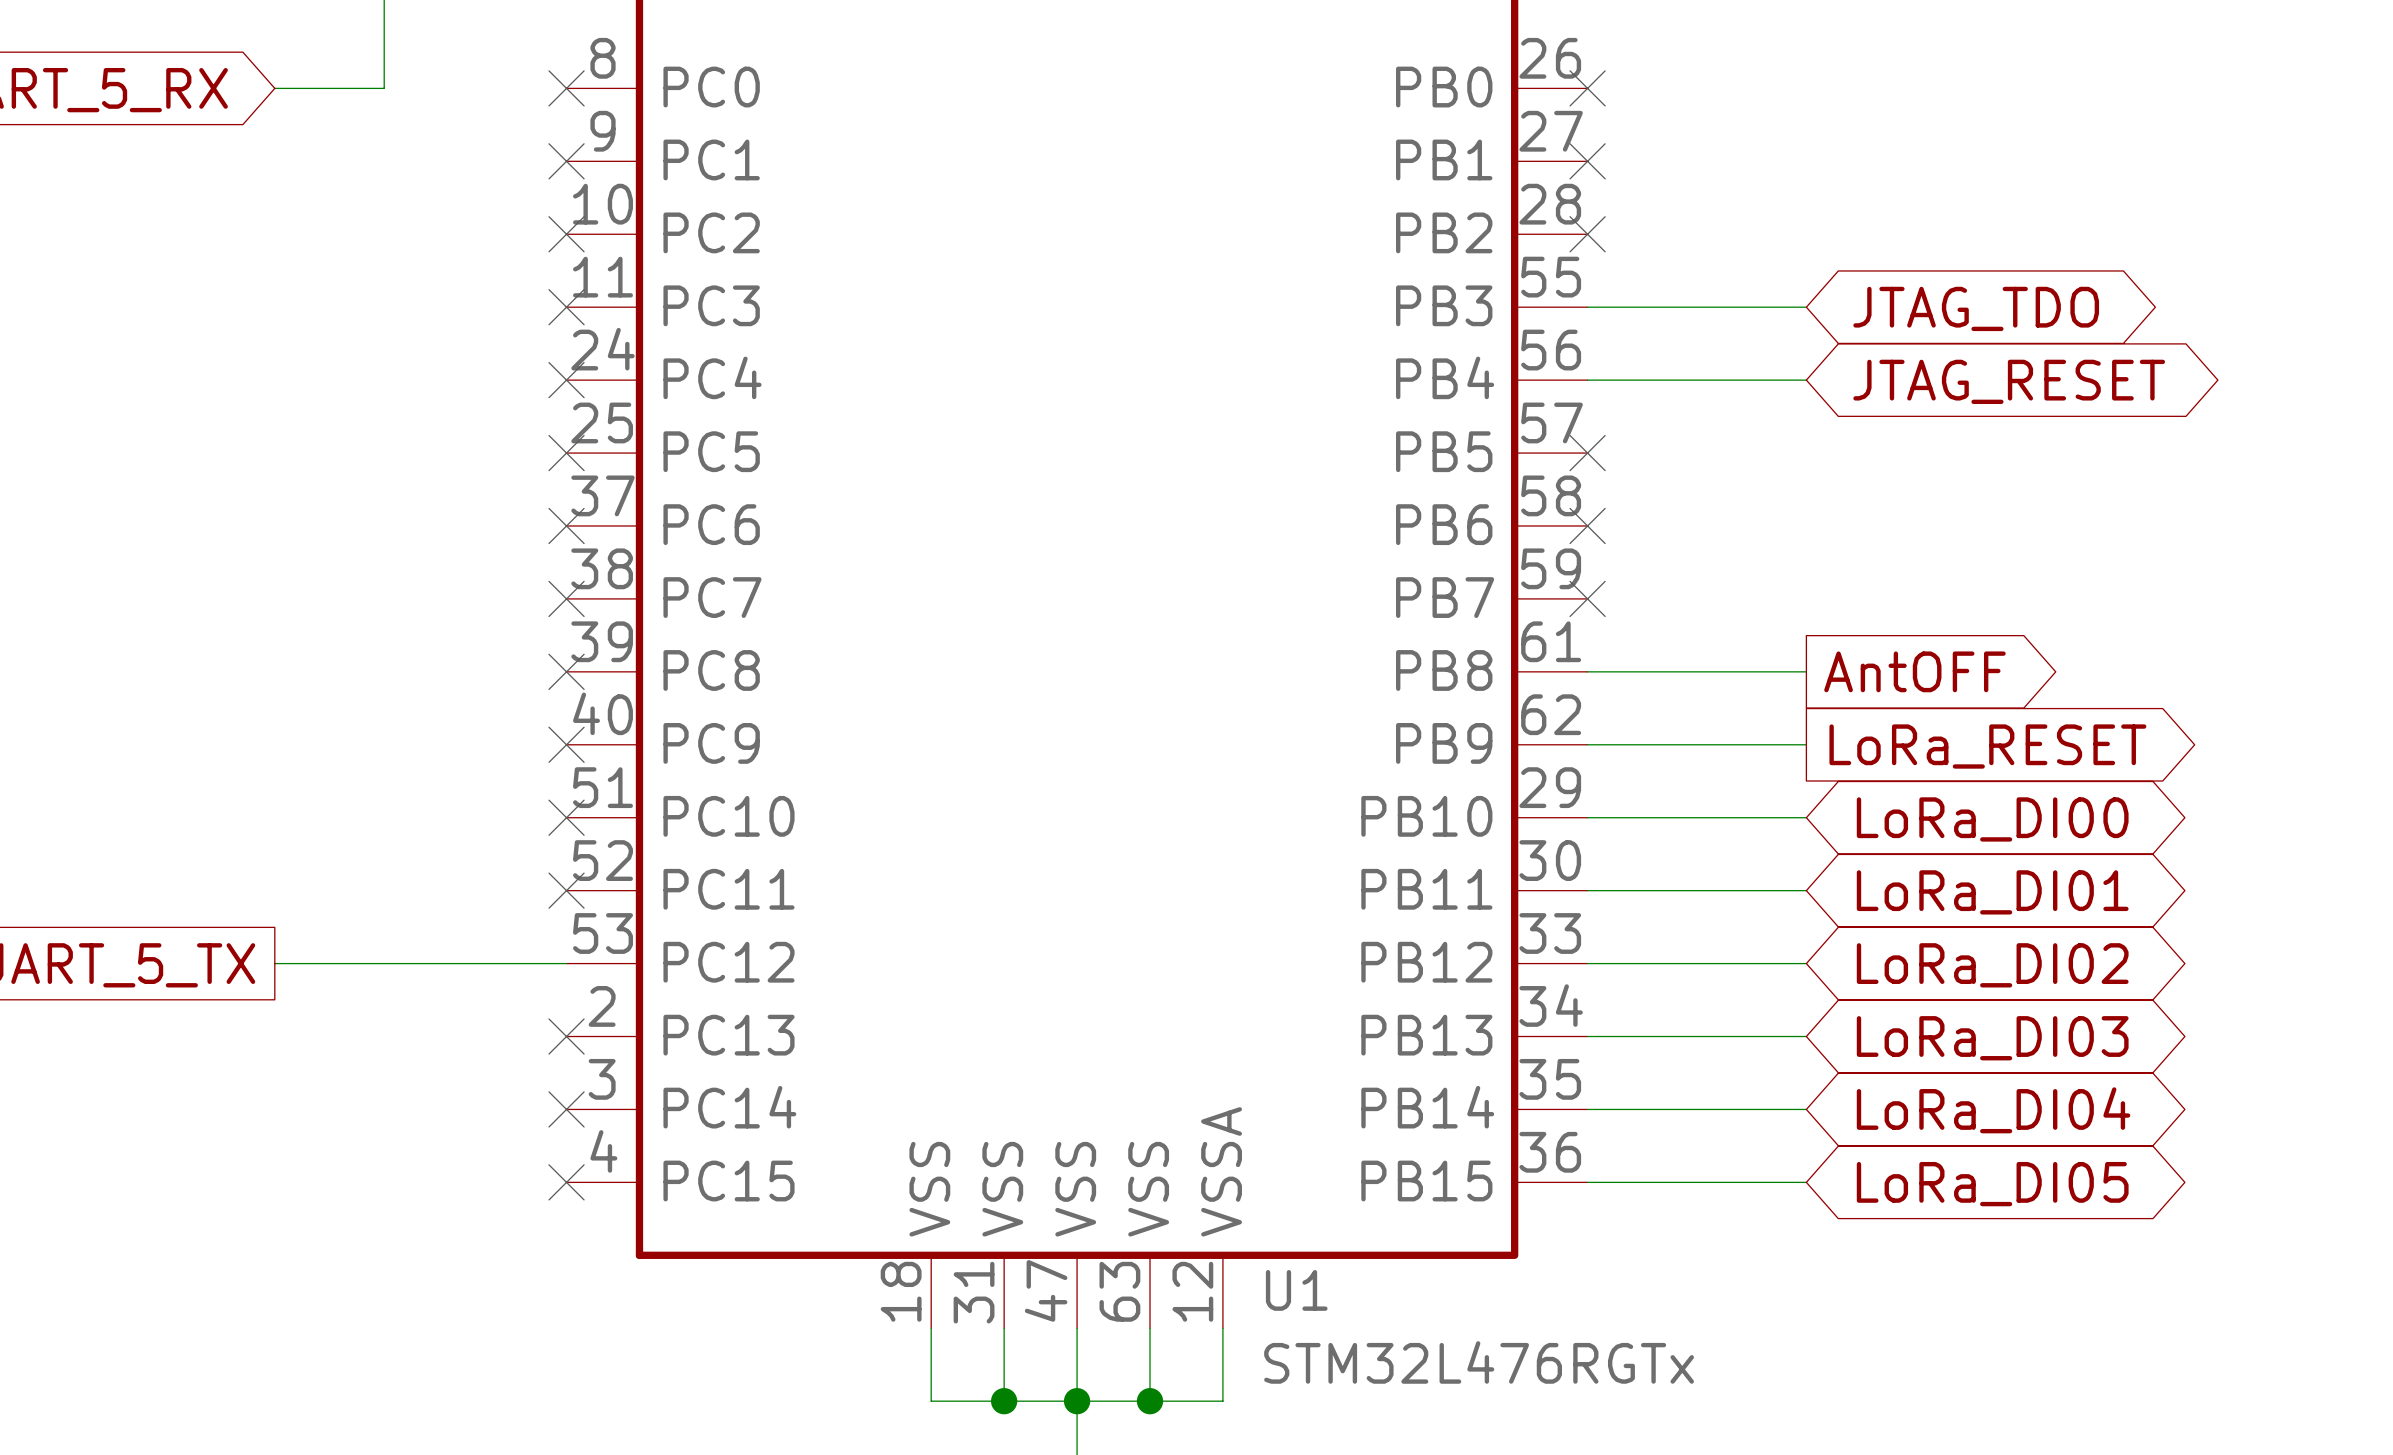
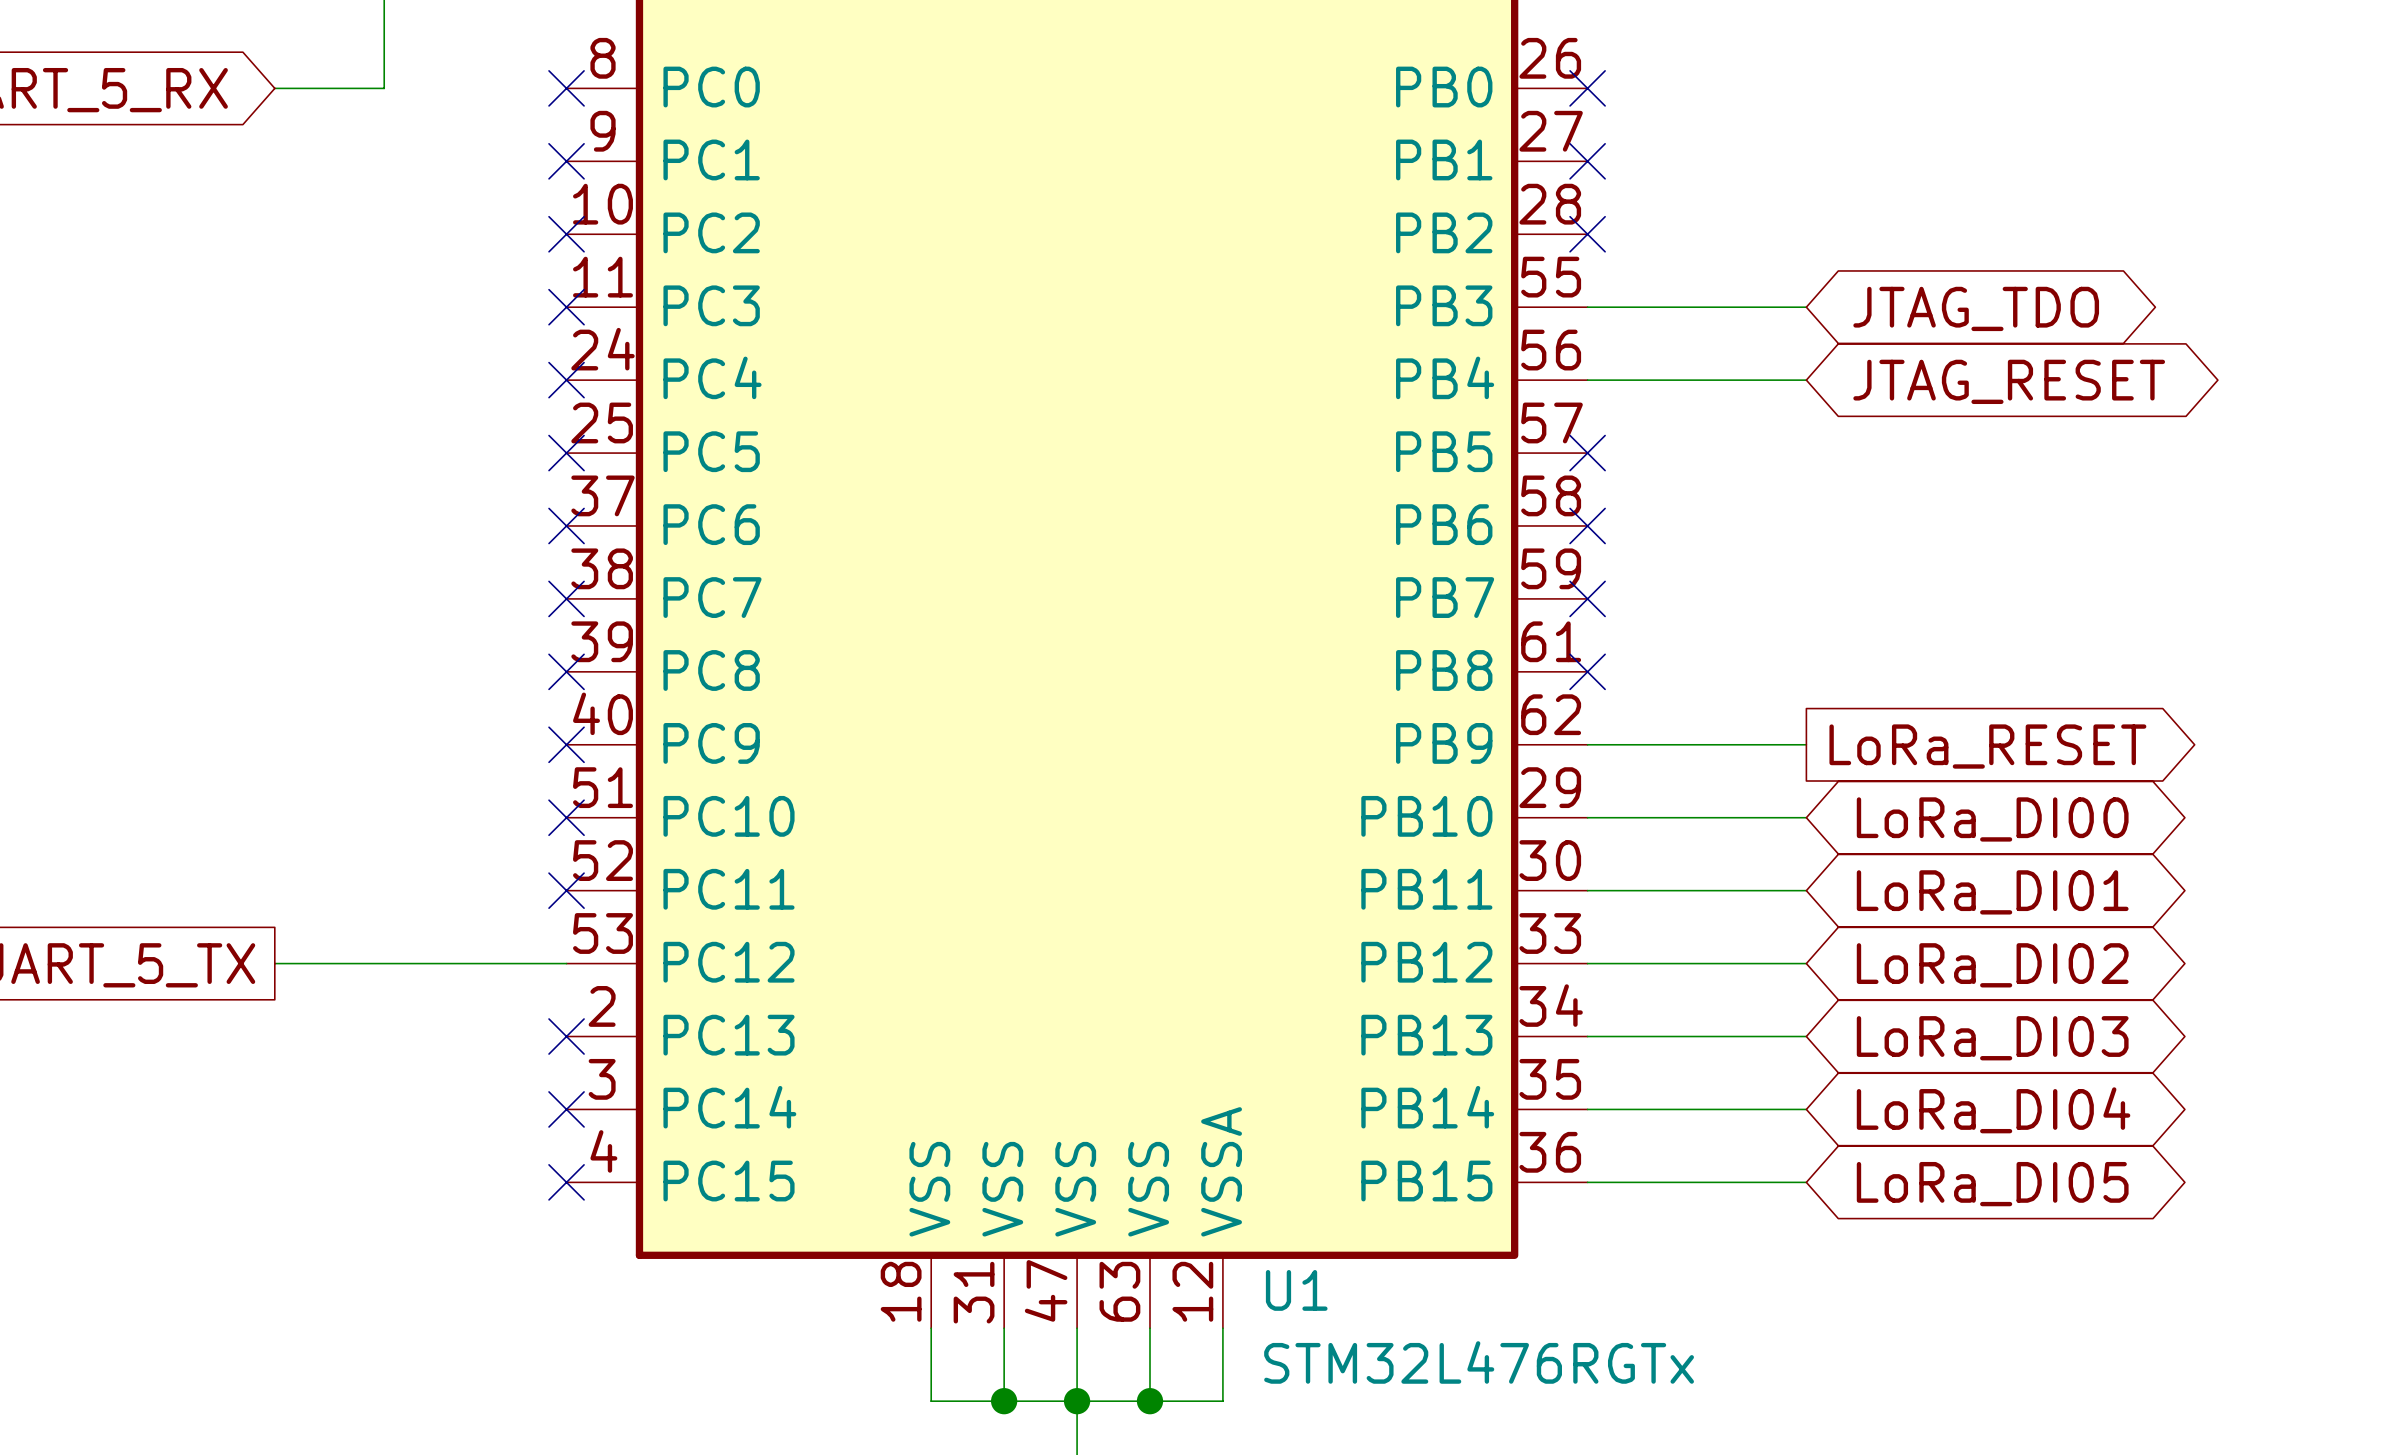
wire: (1587, 671) (1806, 671) -> none
no-connect mark: none -> (1587, 671)
global label: AntOFF (1914, 671) -> none

